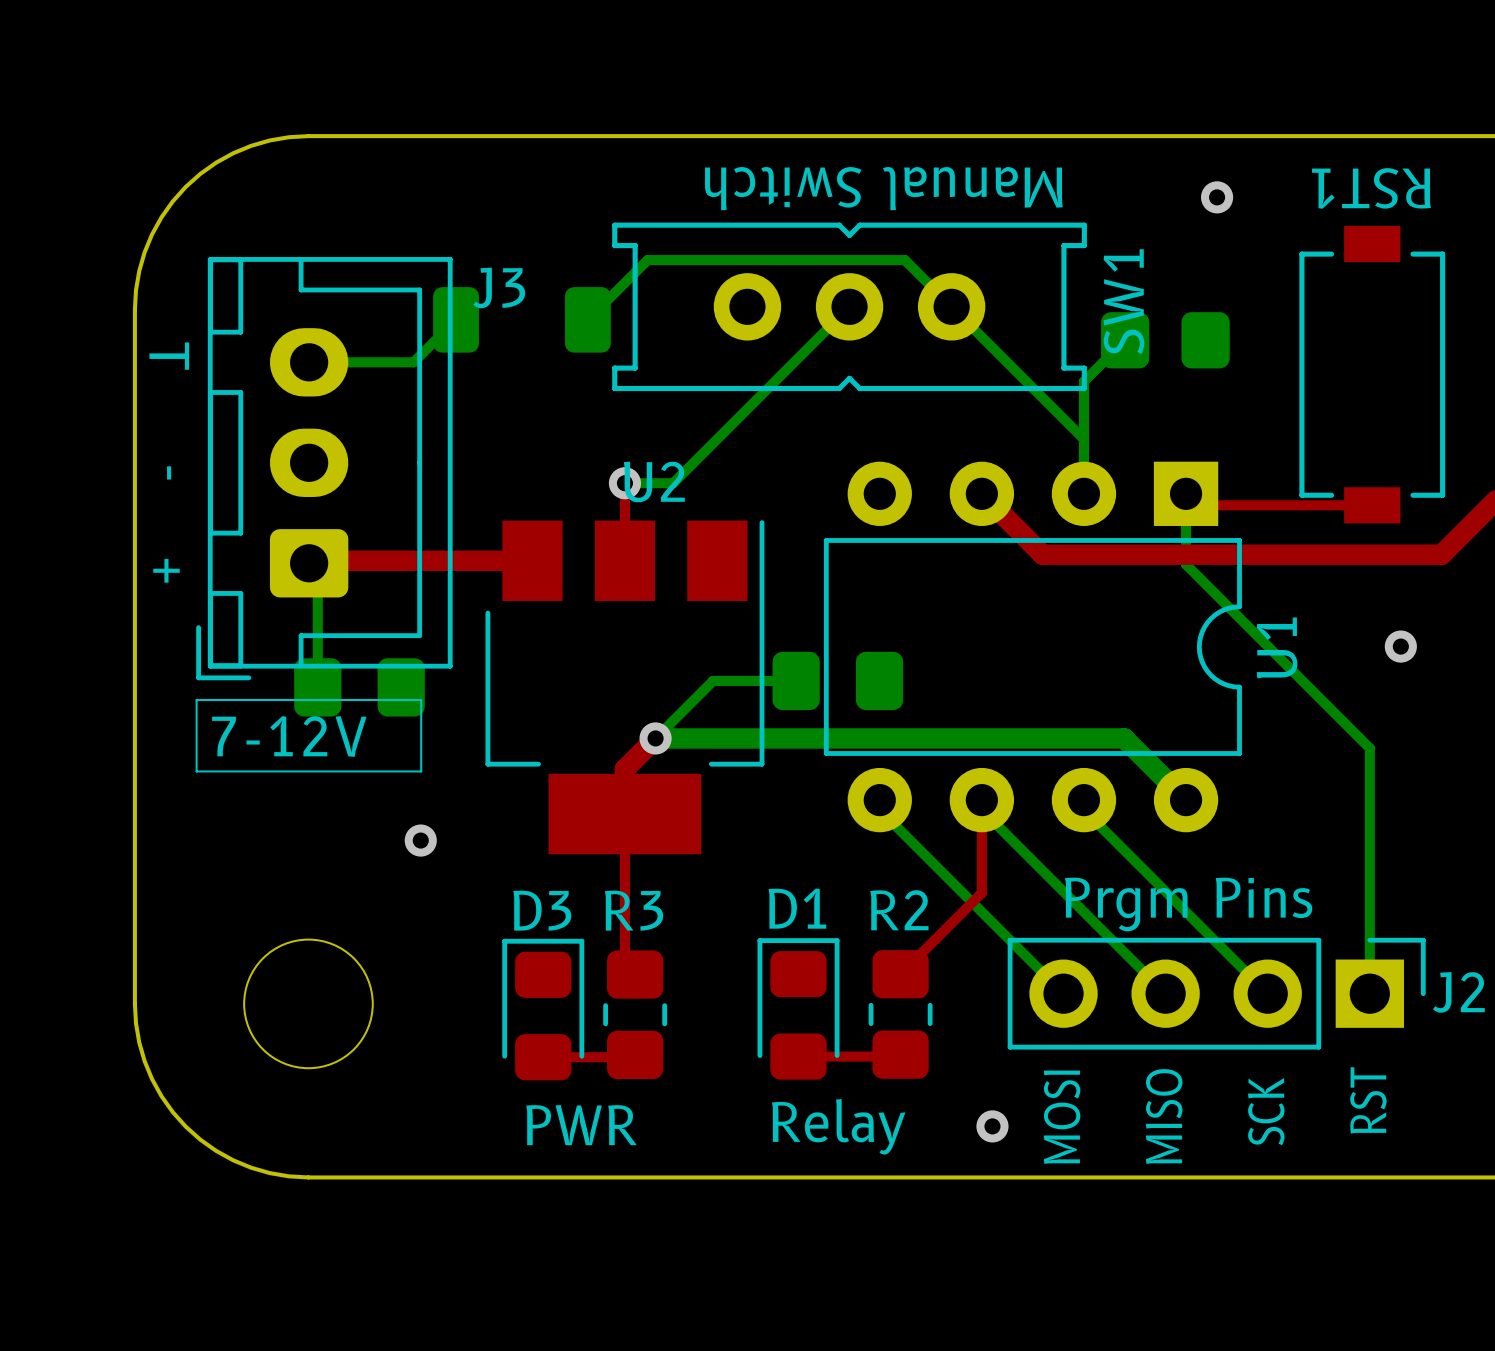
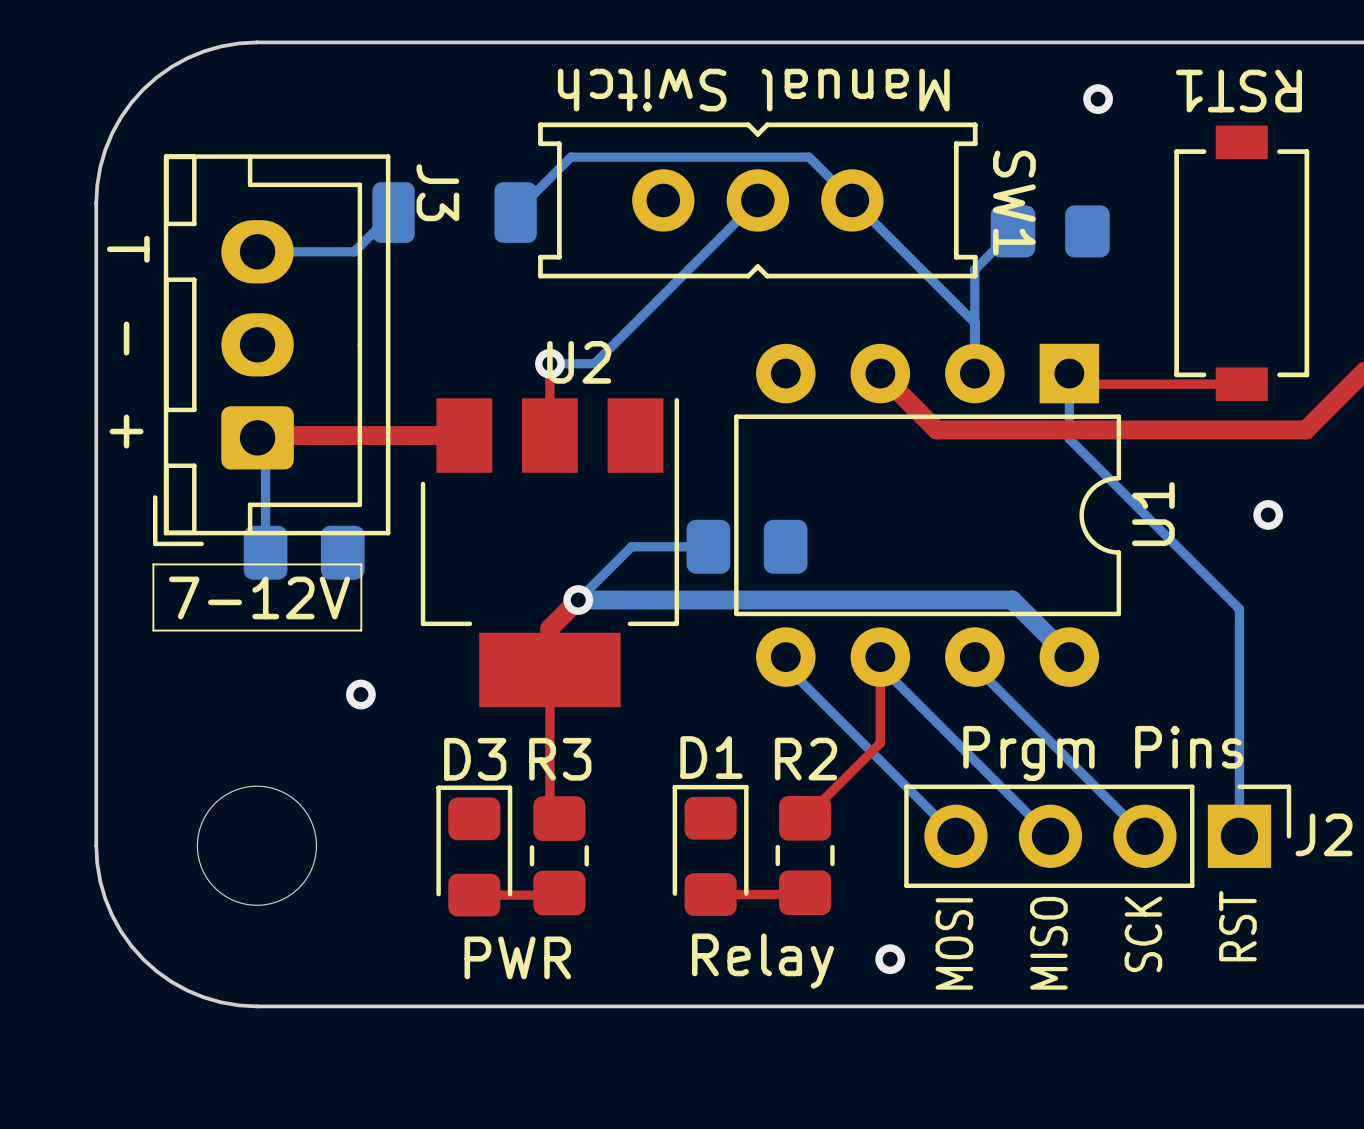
J3 name rotation: 0° (499, 287) -> 90° clockwise (437, 192)
SW1 name rotation: 0° (1123, 301) -> 180° (1014, 203)

